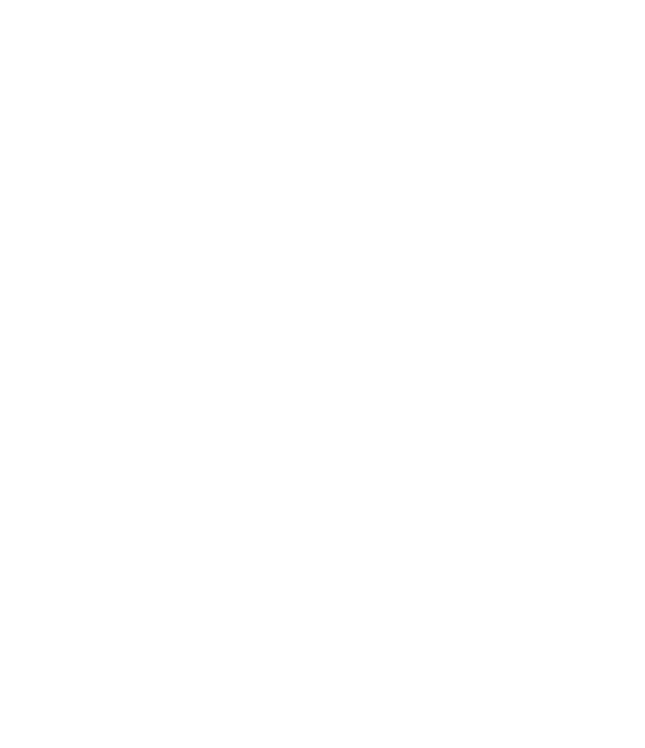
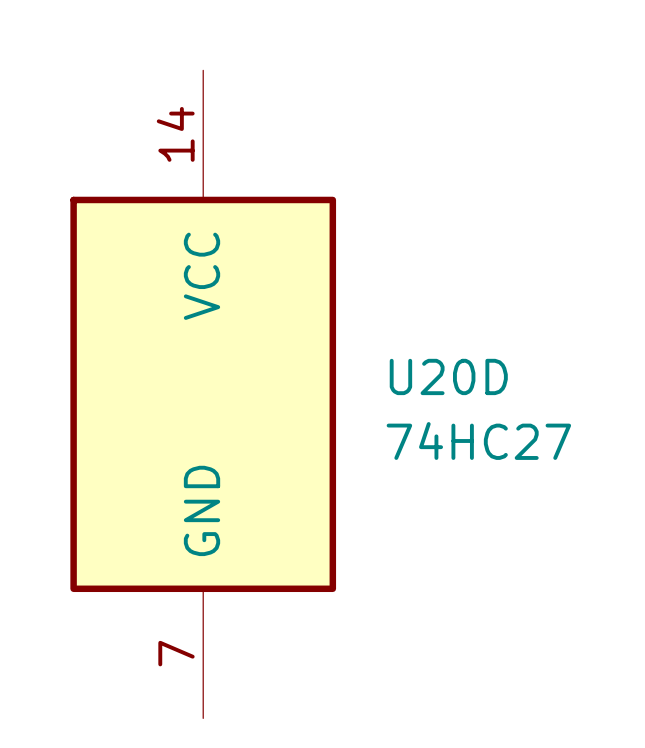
U20D: none -> 74HC27 (203, 394)

